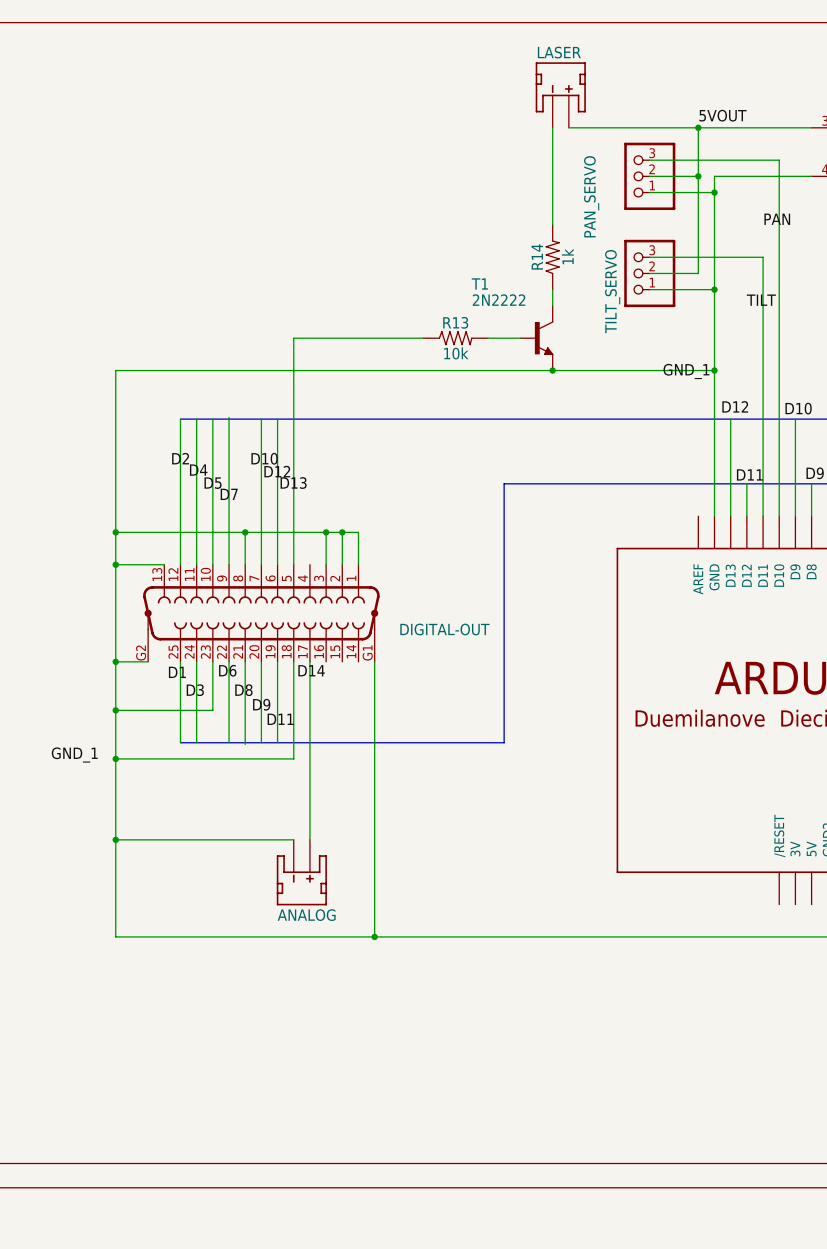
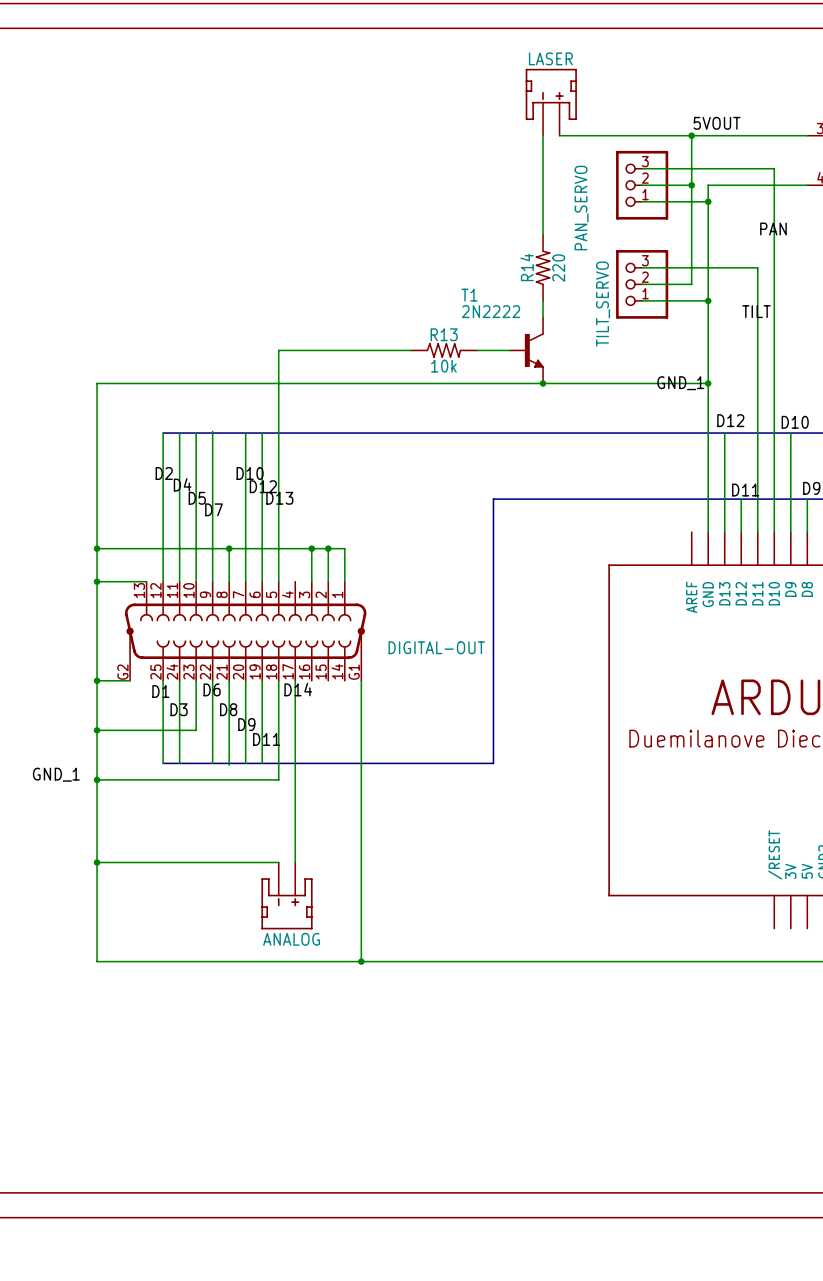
R14 value: 1k (567, 256) -> 220 (558, 268)

